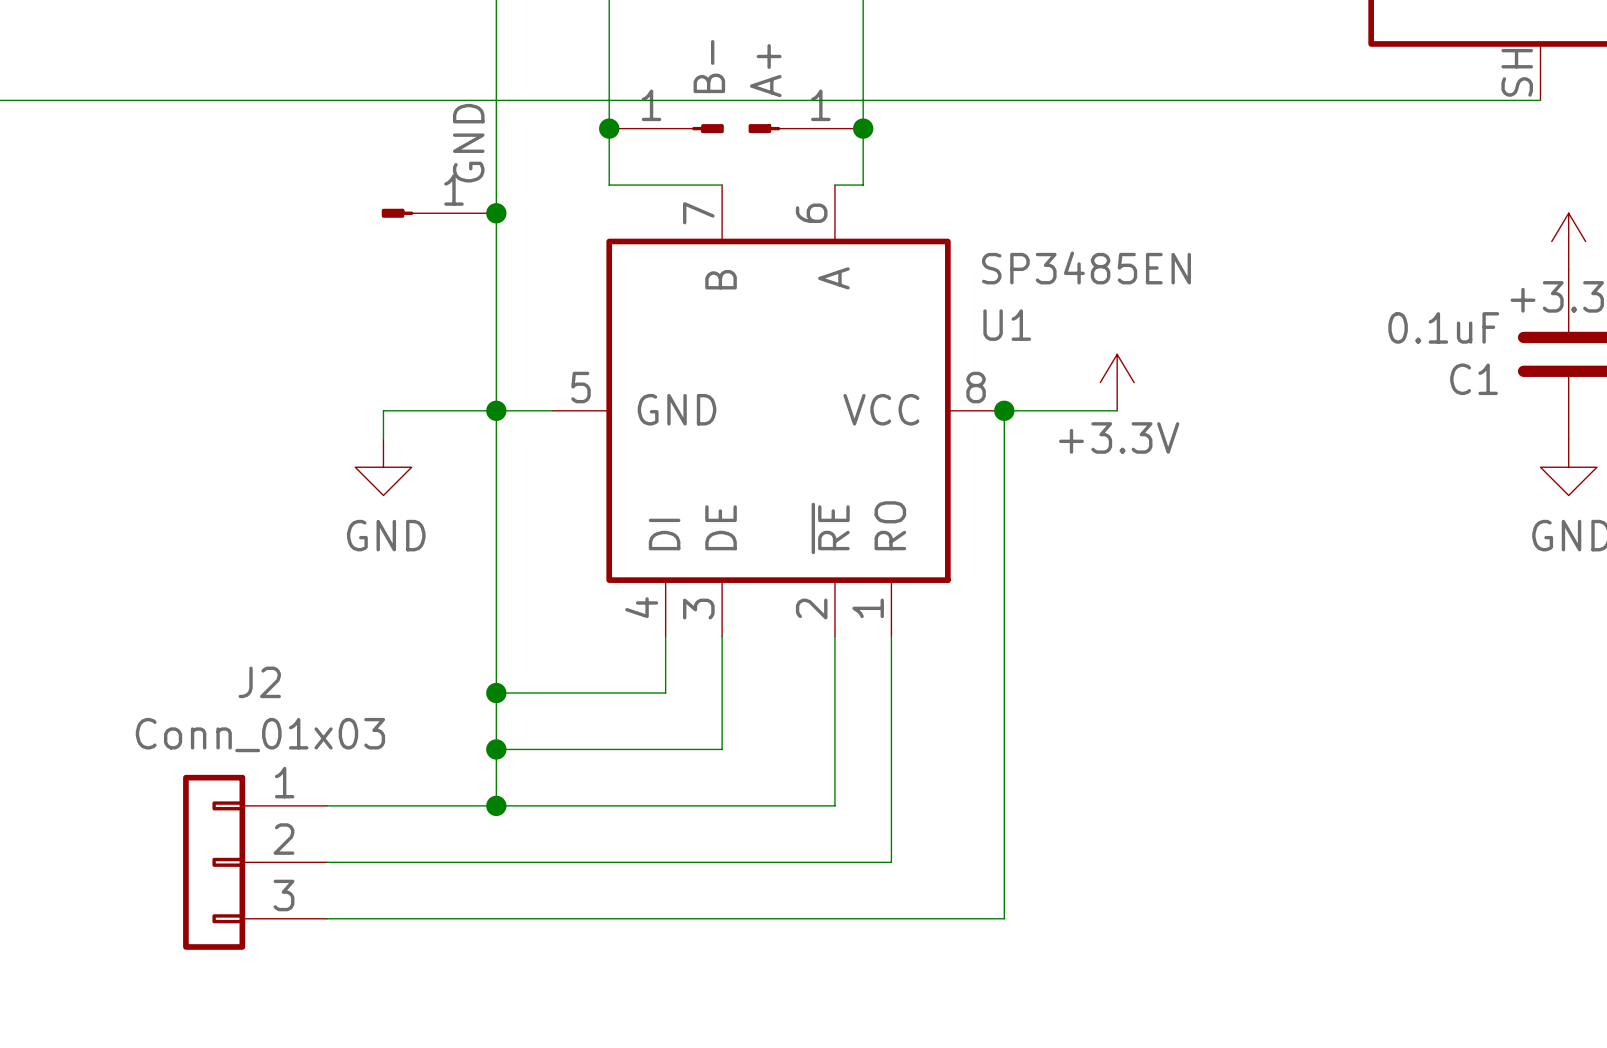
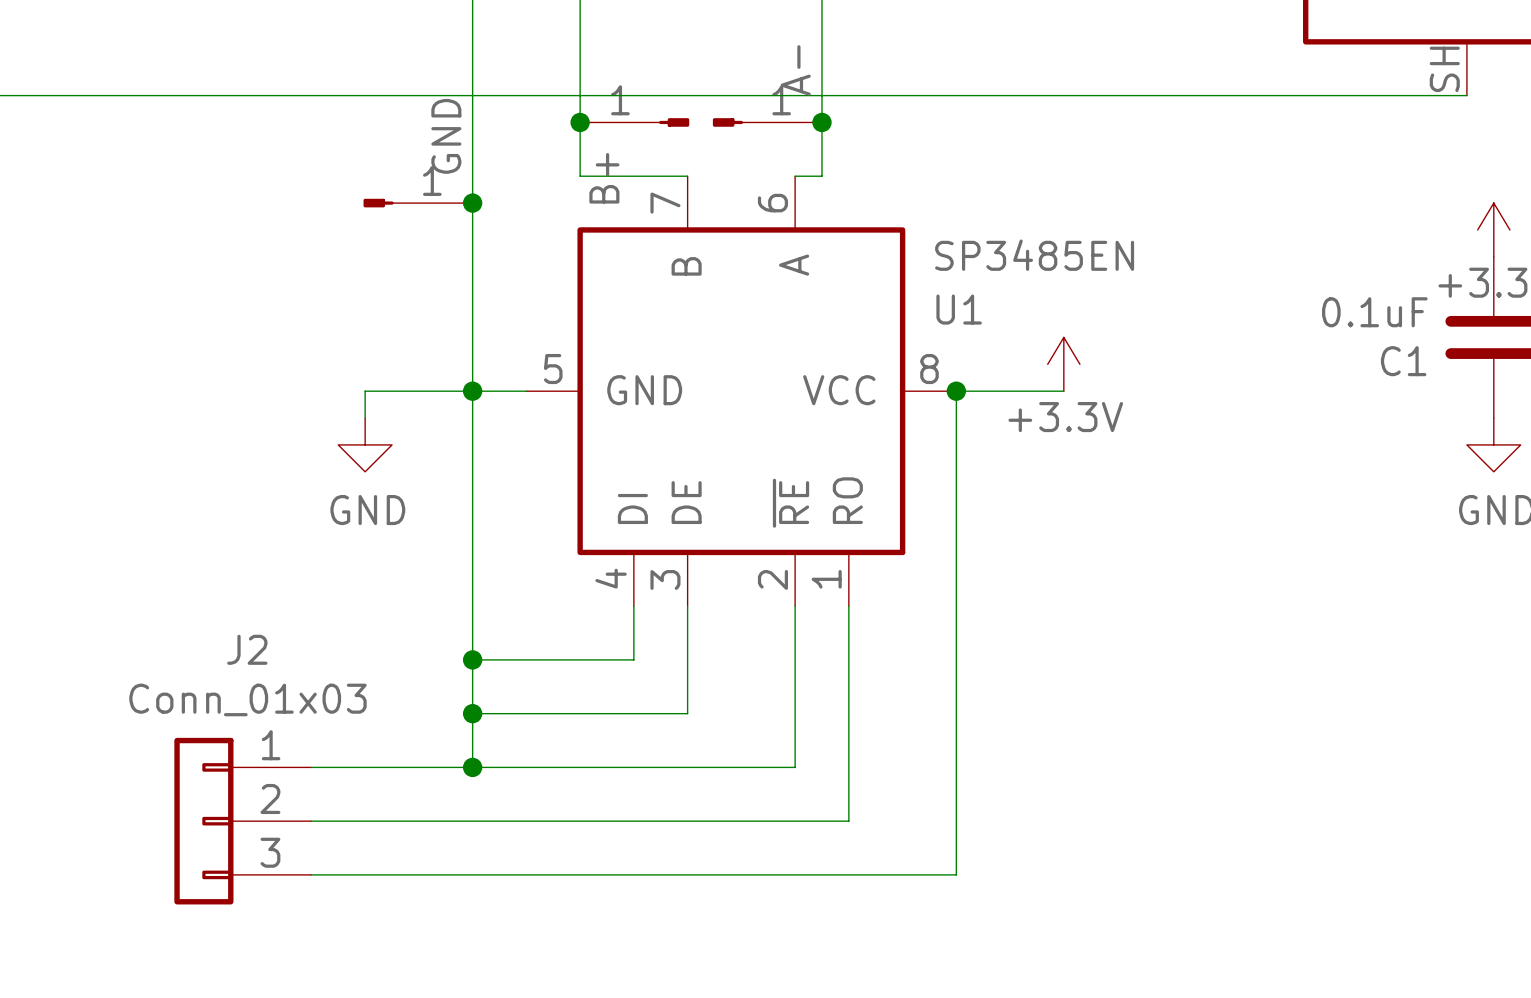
part value: B- (709, 66) -> B+ (604, 178)
part value: A+ (765, 70) -> A- (795, 70)

